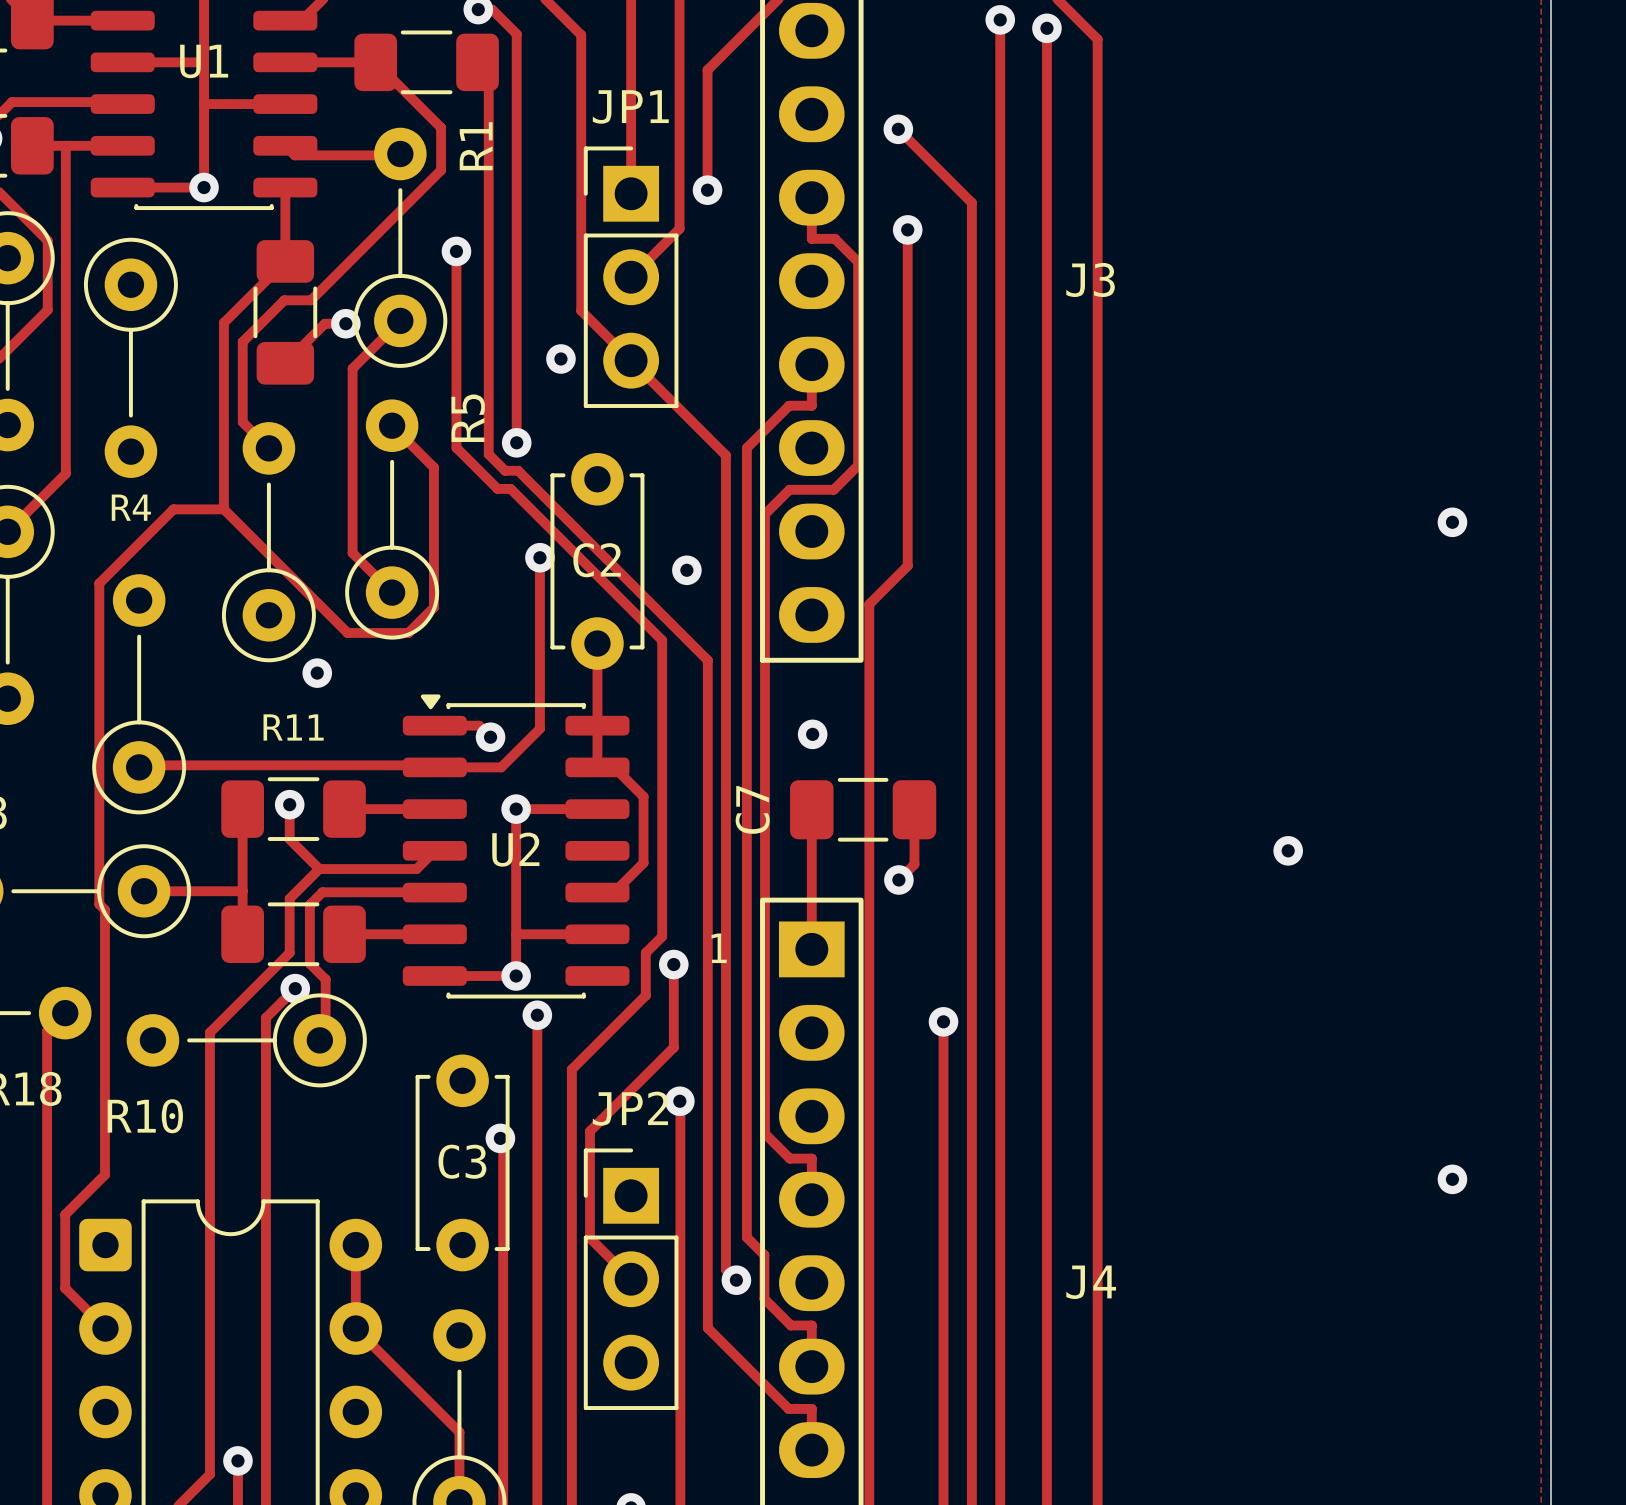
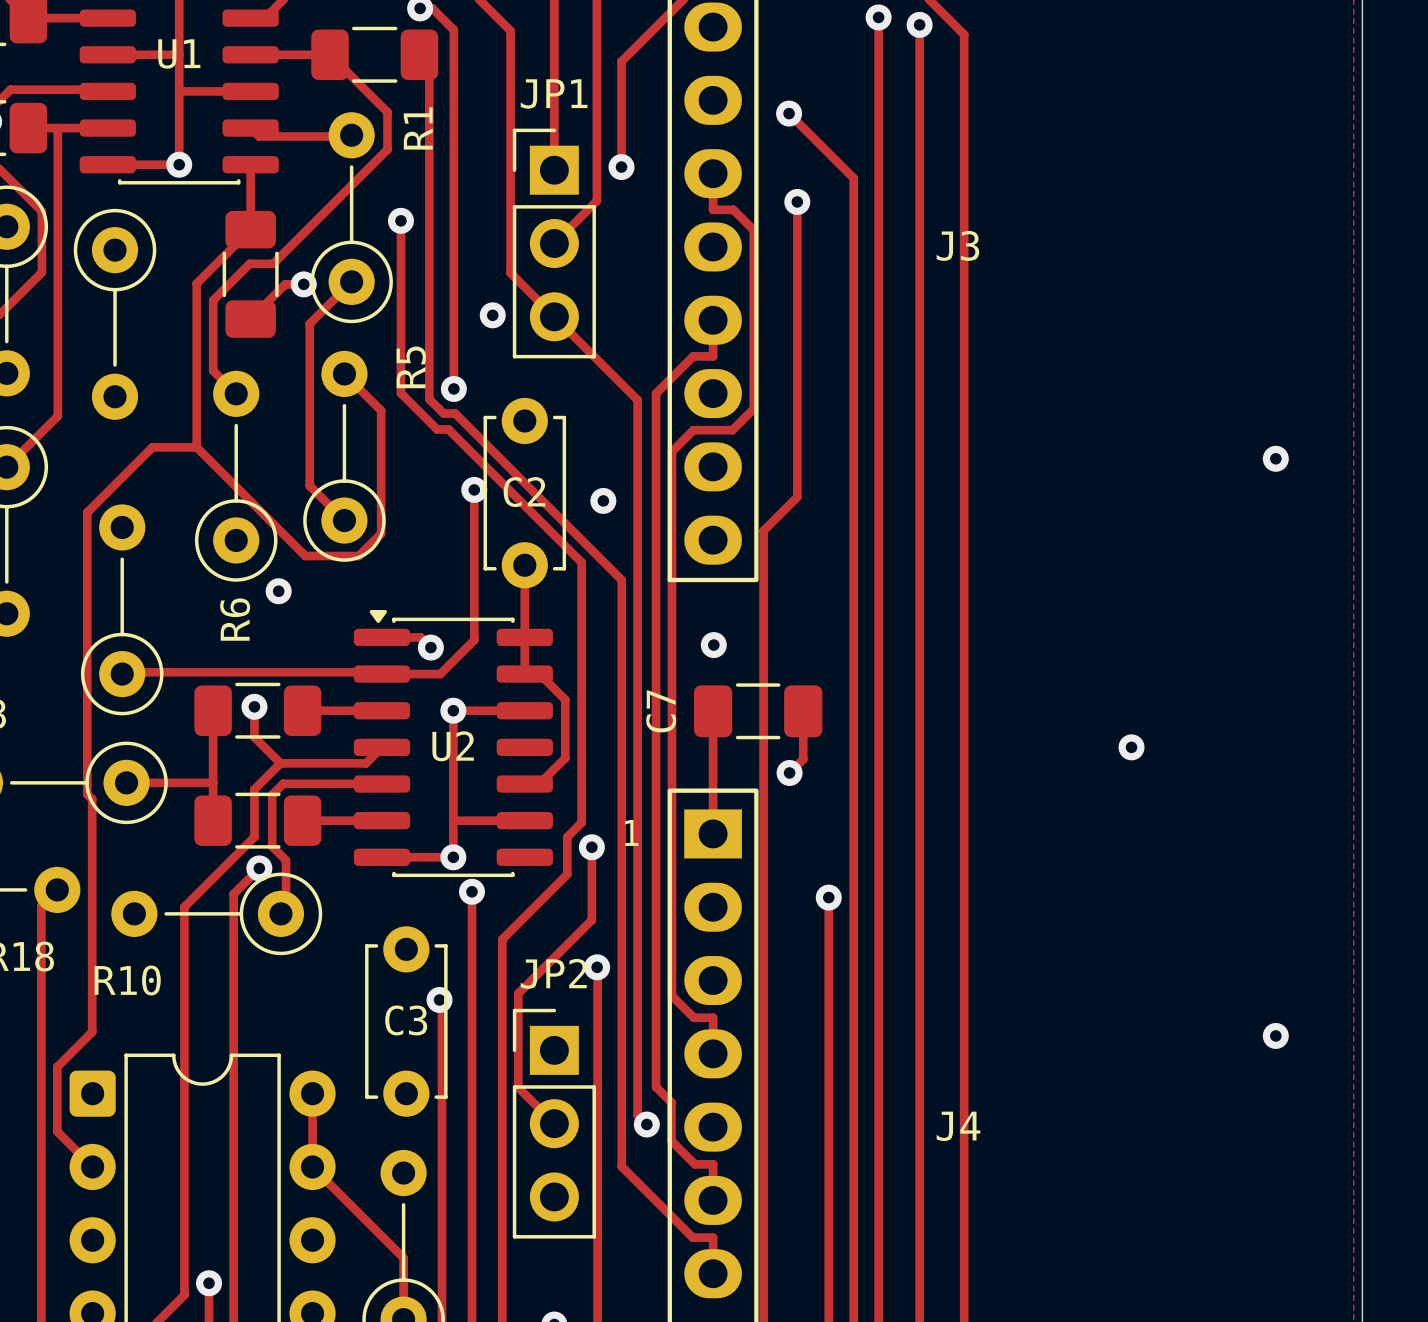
R4 name: R4 (131, 507) -> none
R6 name: none -> R6 (235, 619)
R11 name: R11 (293, 727) -> none

